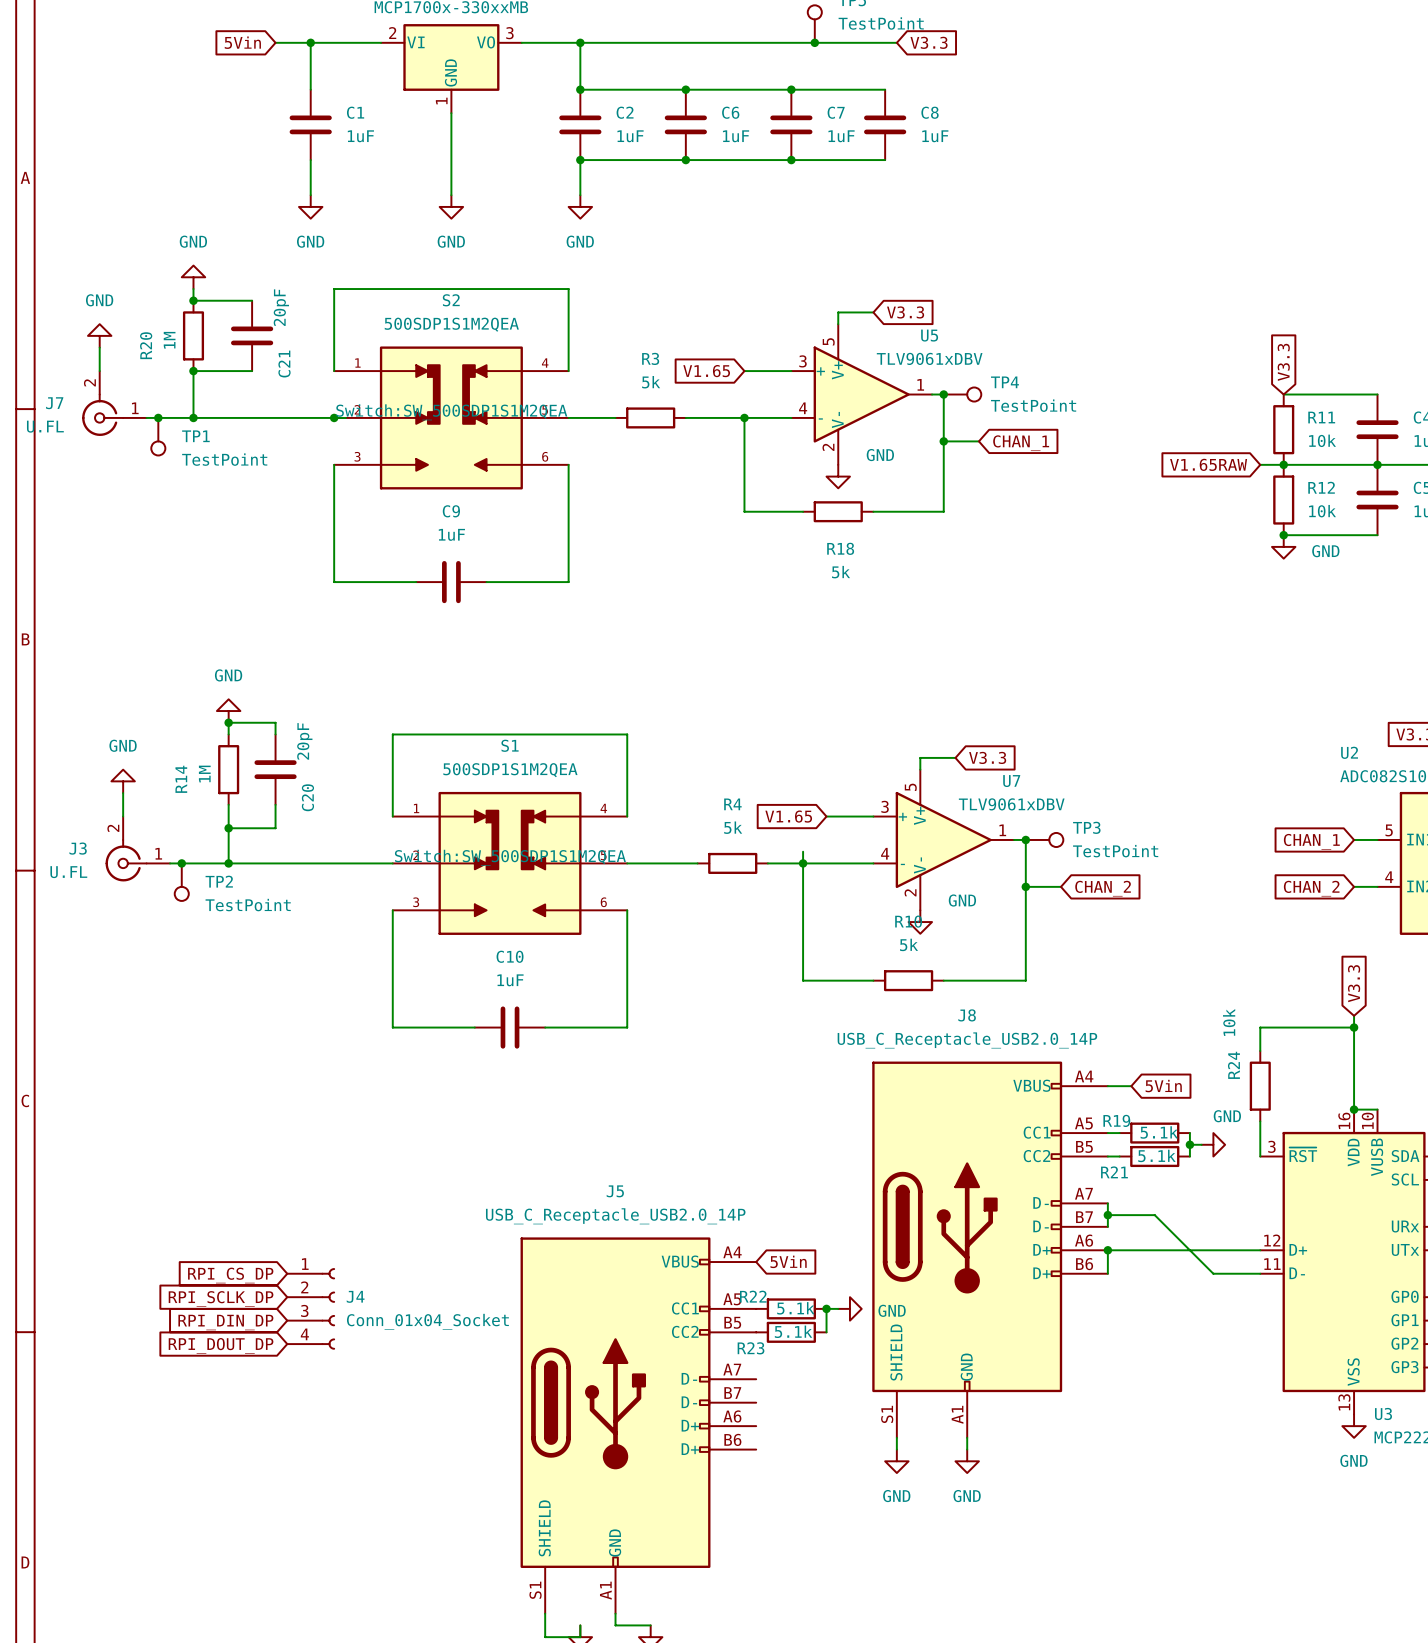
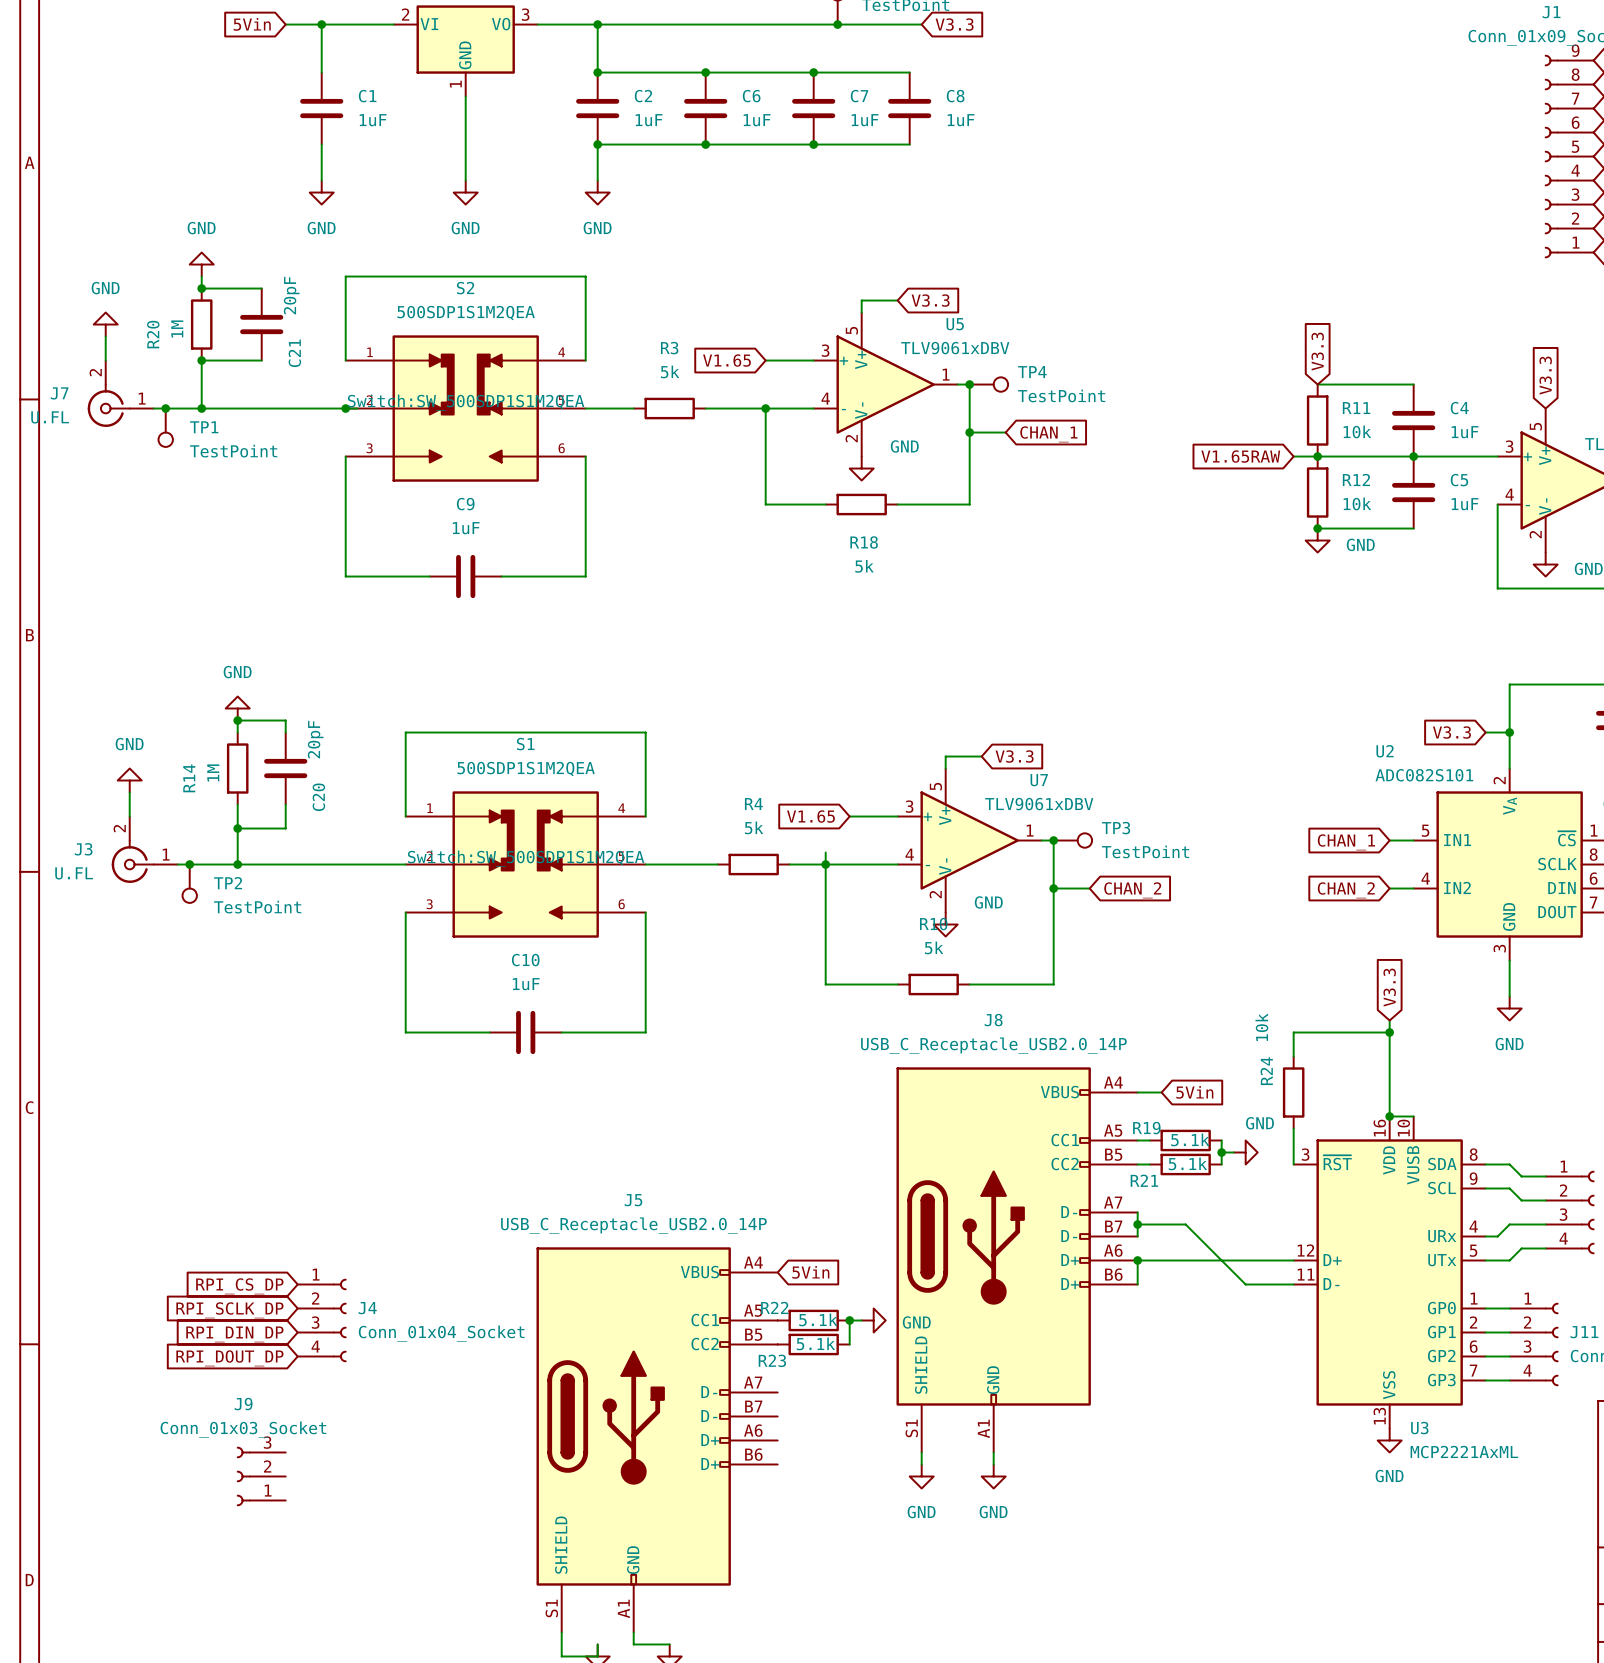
J9: none -> Conn_01x03_Socket (261, 1476)

